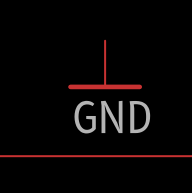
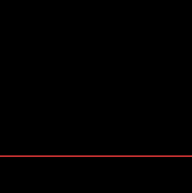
power symbol: GND (105, 64) -> none

